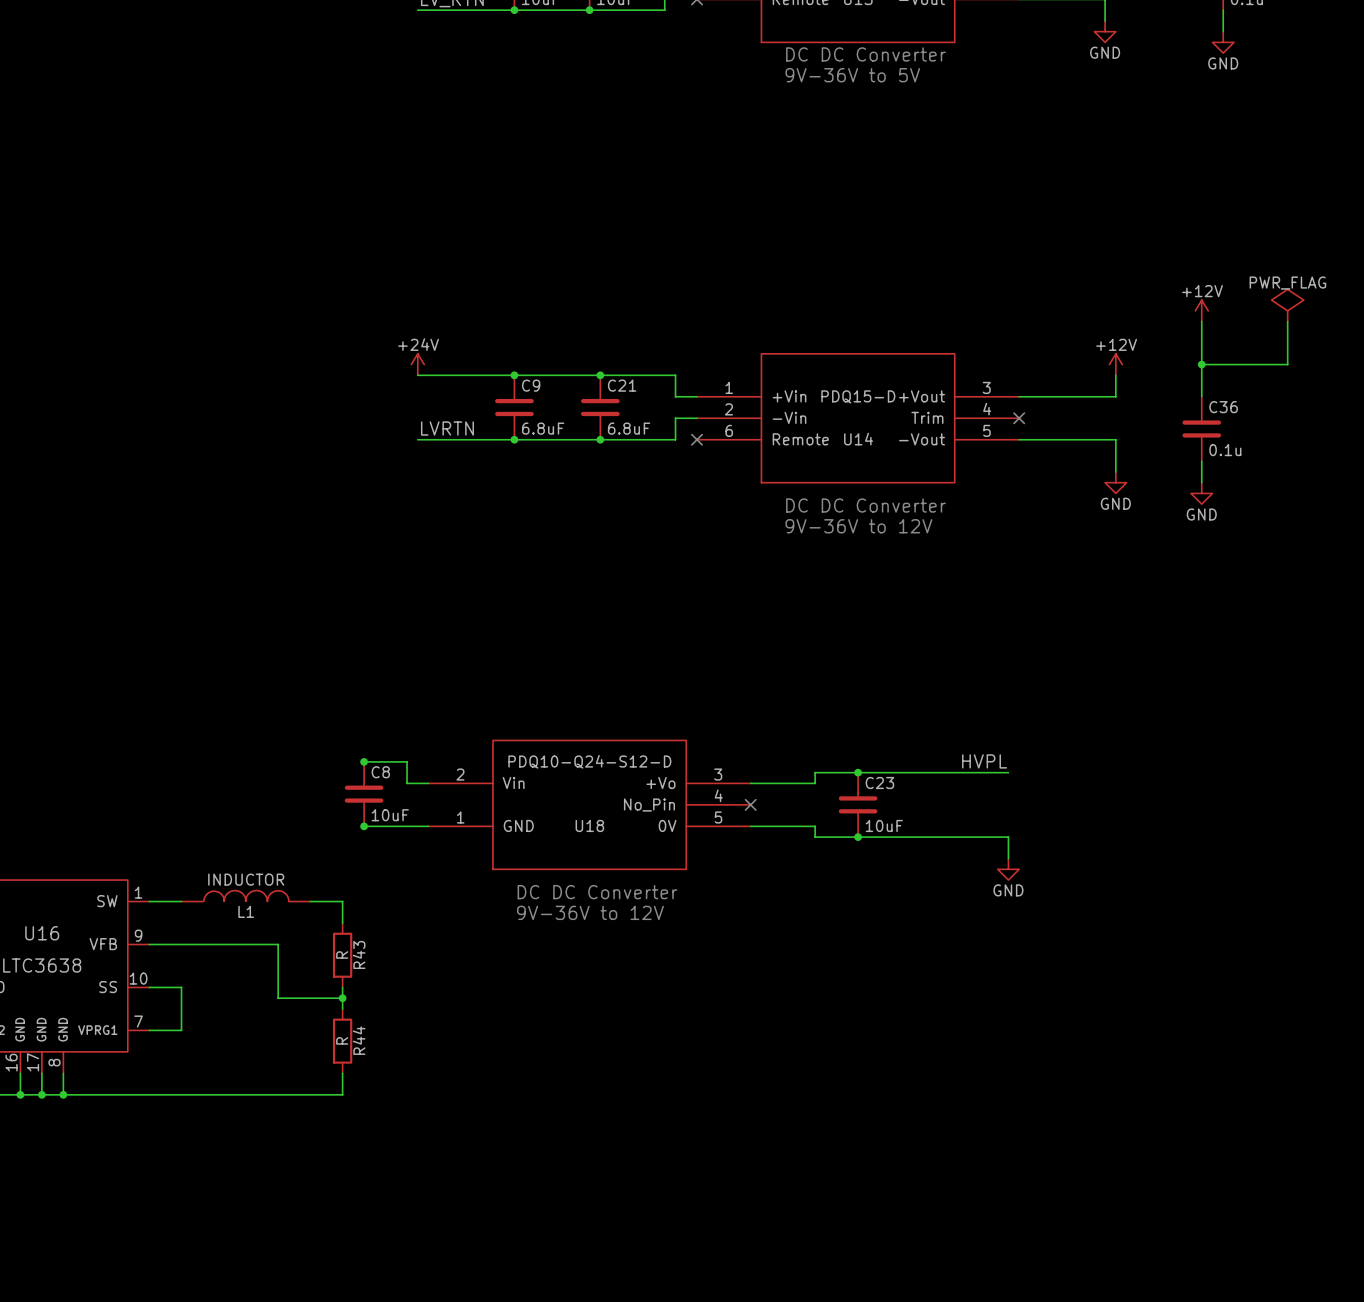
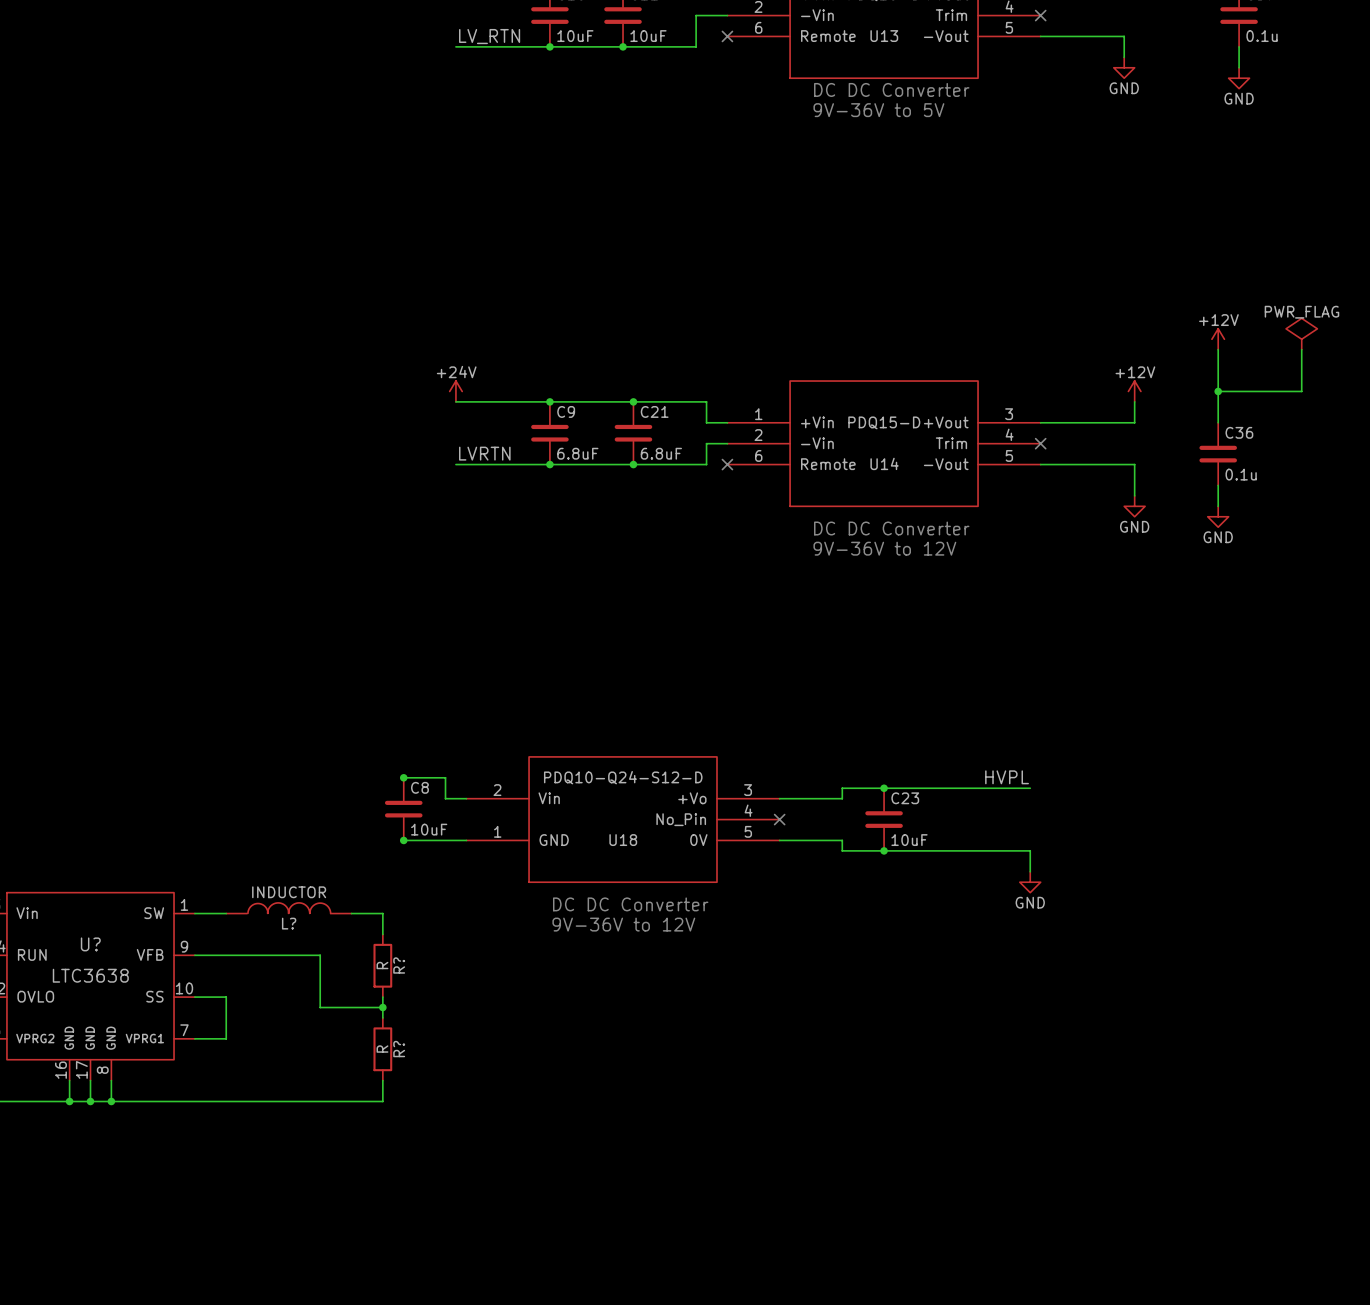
L1 name: L1 (246, 911) -> L? (289, 923)
U16 name: U16 (42, 933) -> U? (90, 944)
R43 name: R43 (359, 954) -> R? (399, 965)
R44 name: R44 (359, 1040) -> R? (399, 1049)

